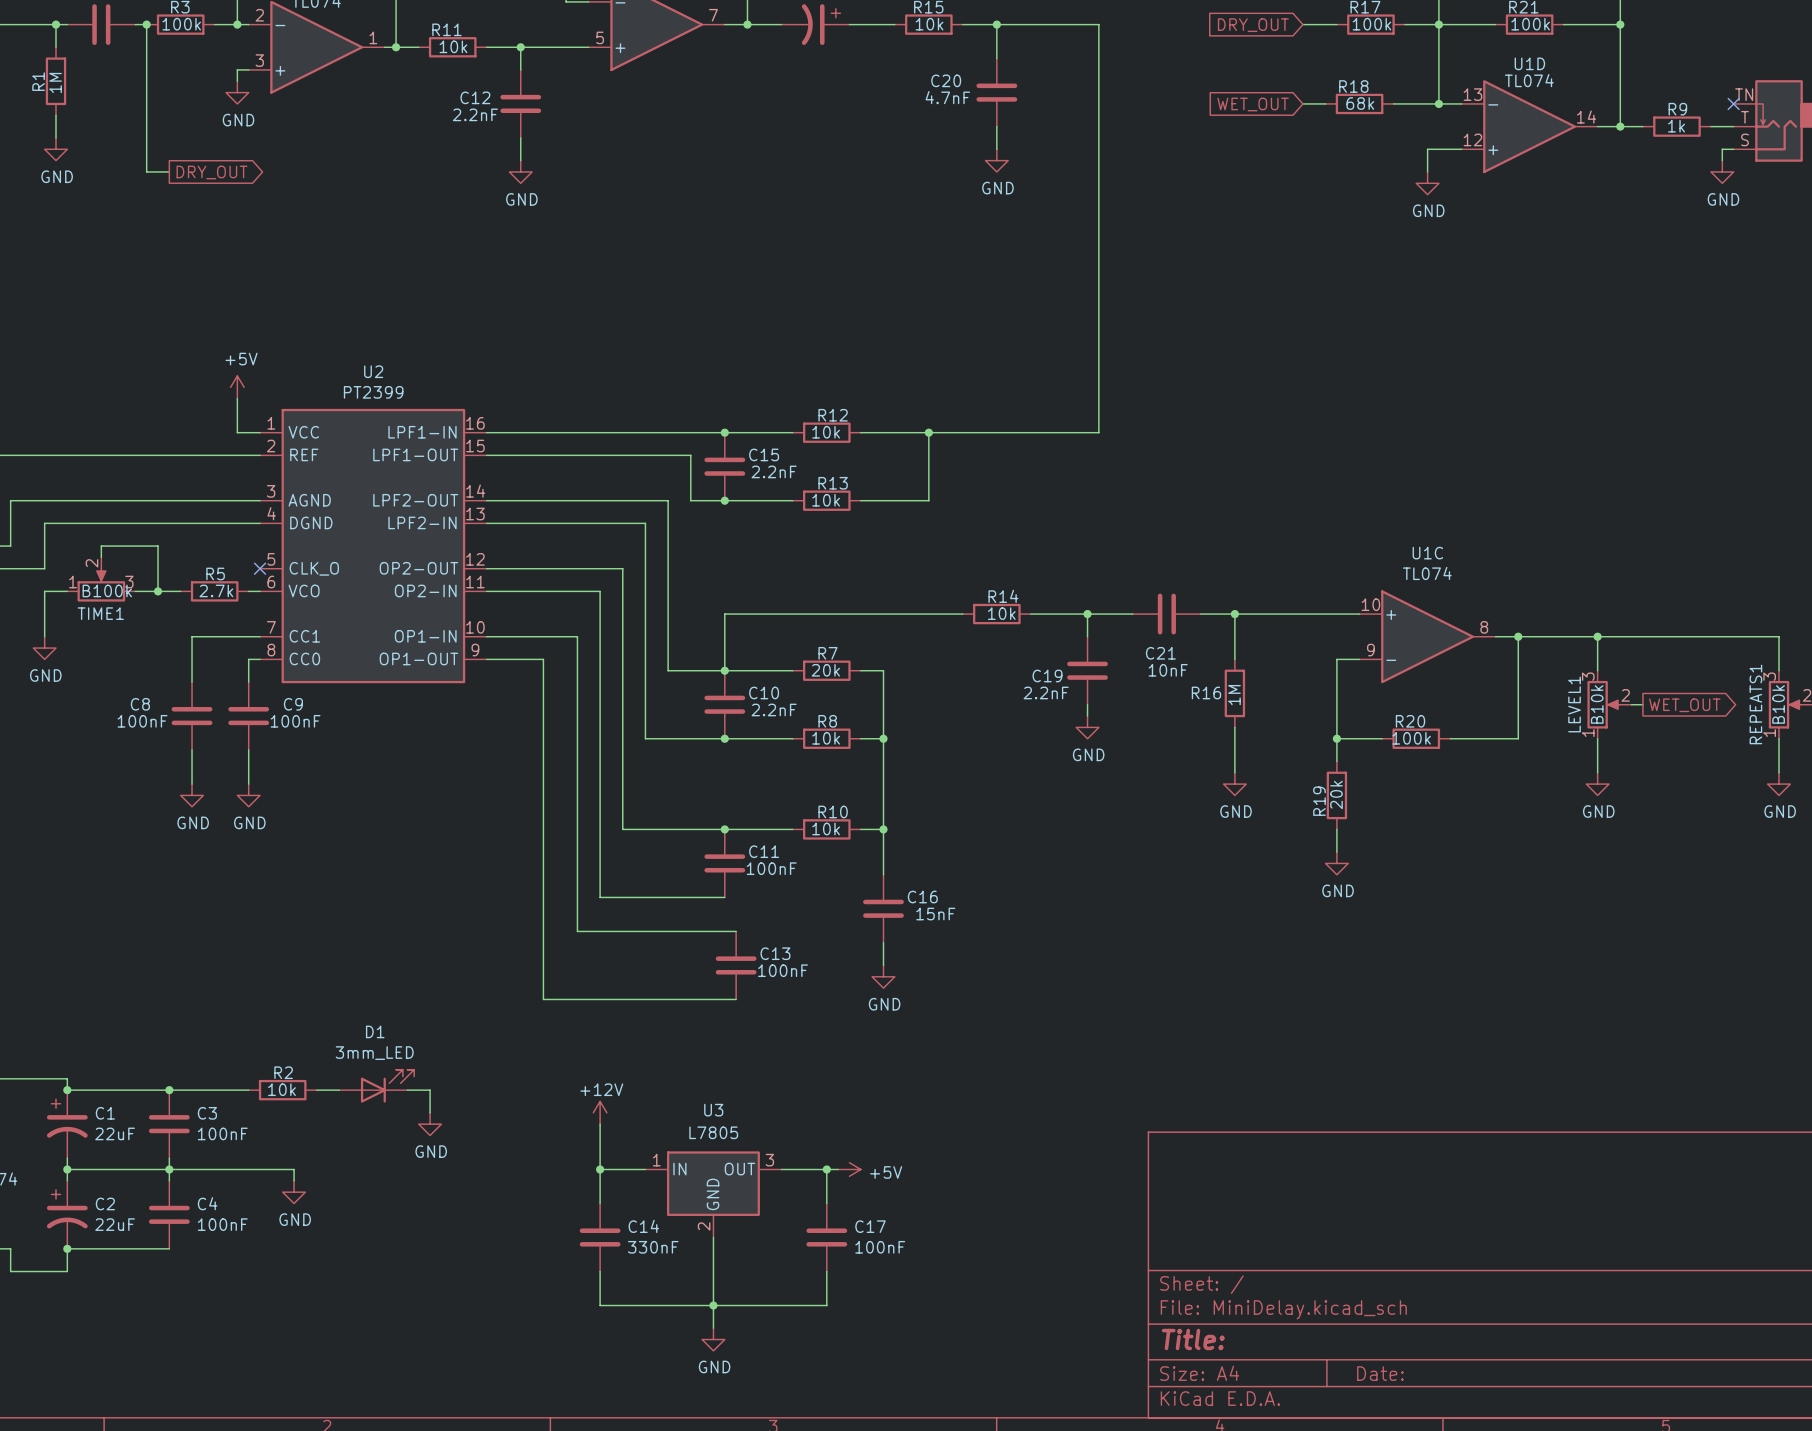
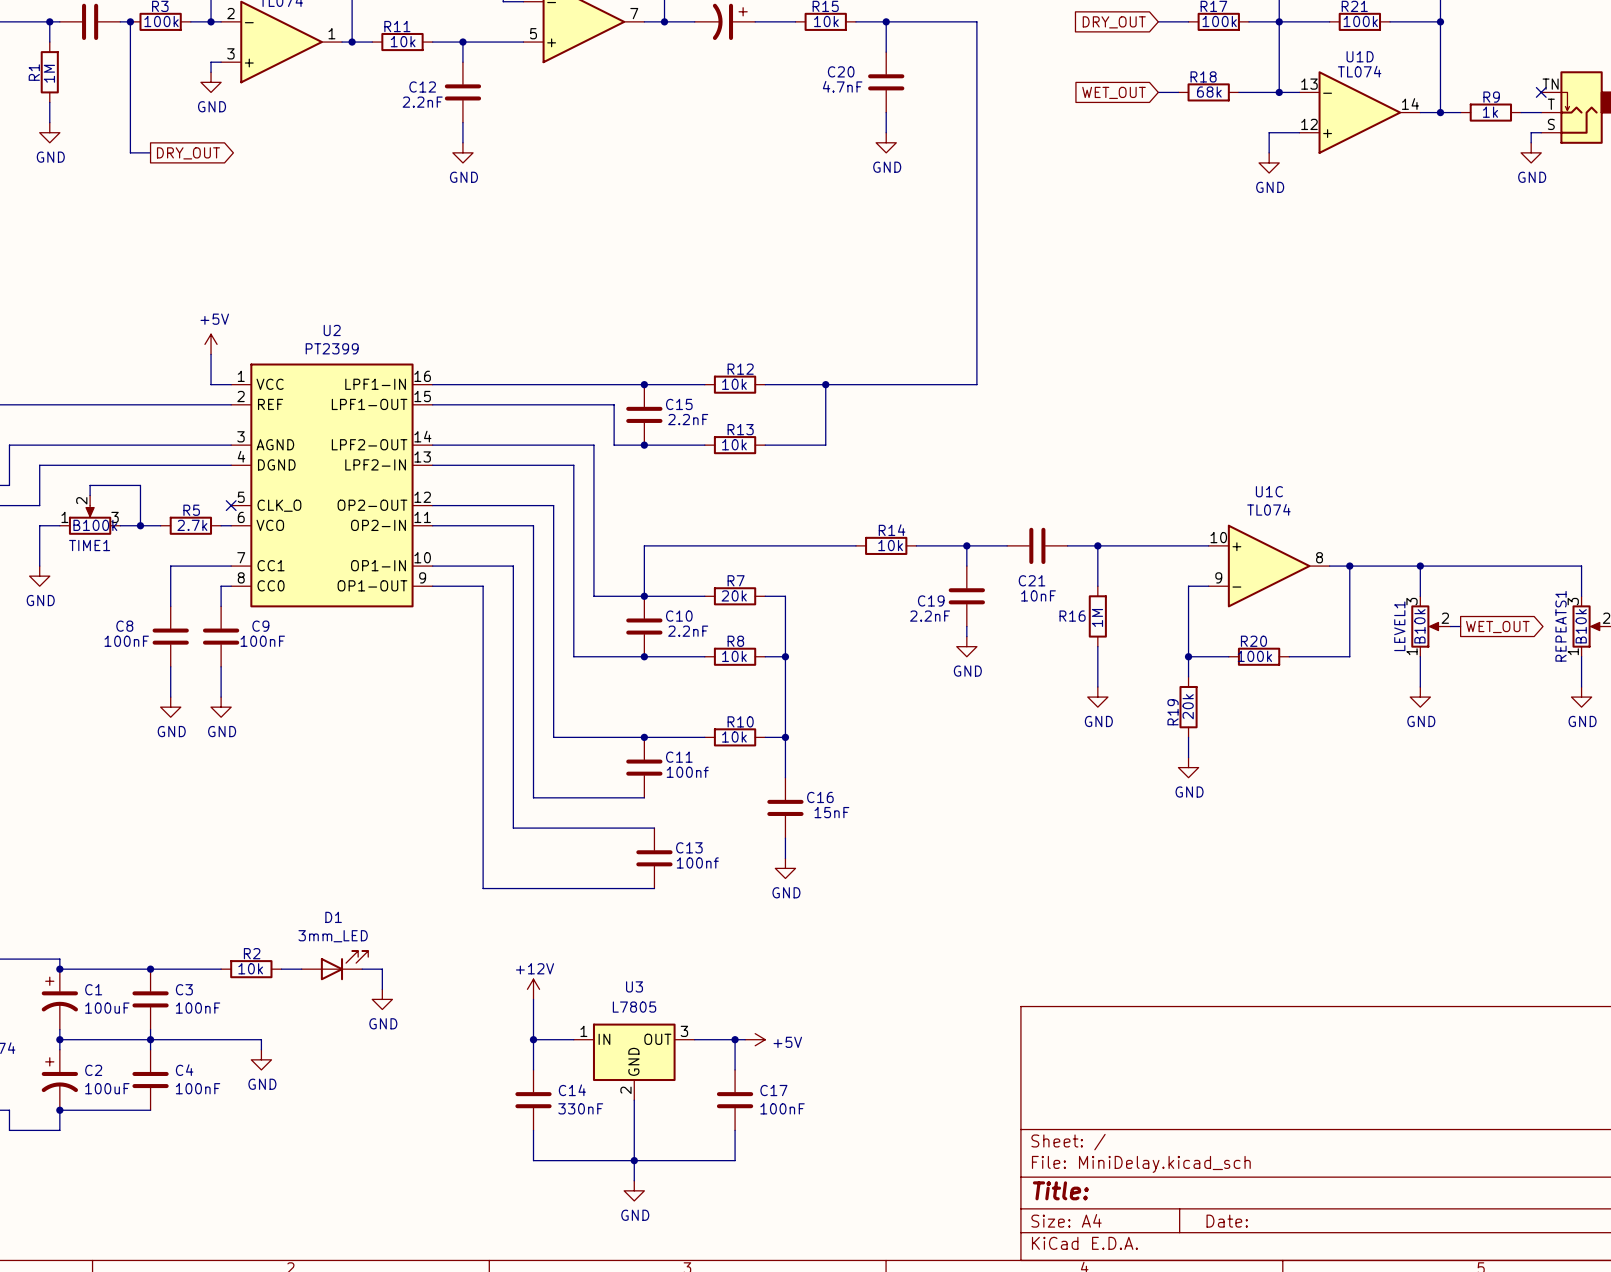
C11 value: 100nF (771, 868) -> 100nf (687, 772)
C13 value: 100nF (783, 970) -> 100nf (697, 862)
C1 value: 22uF (115, 1133) -> 100uF (107, 1008)
C2 value: 22uF (115, 1224) -> 100uF (107, 1088)

